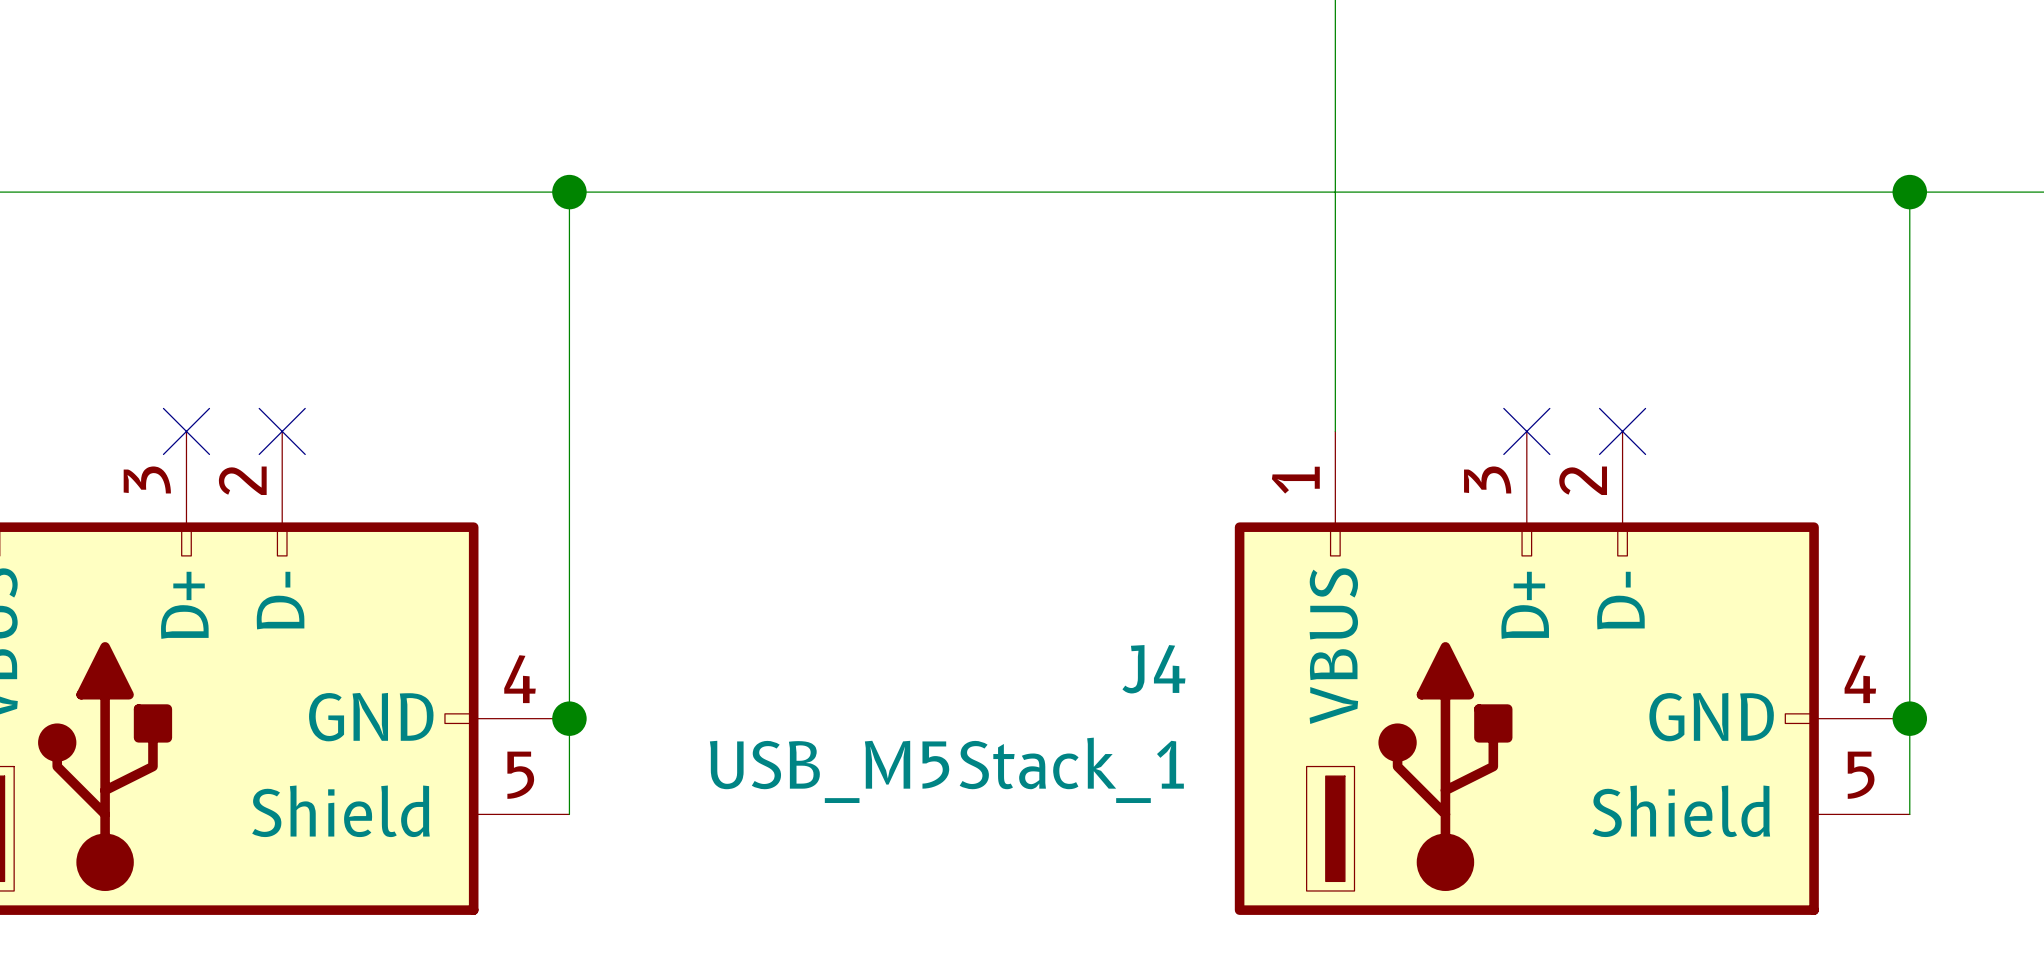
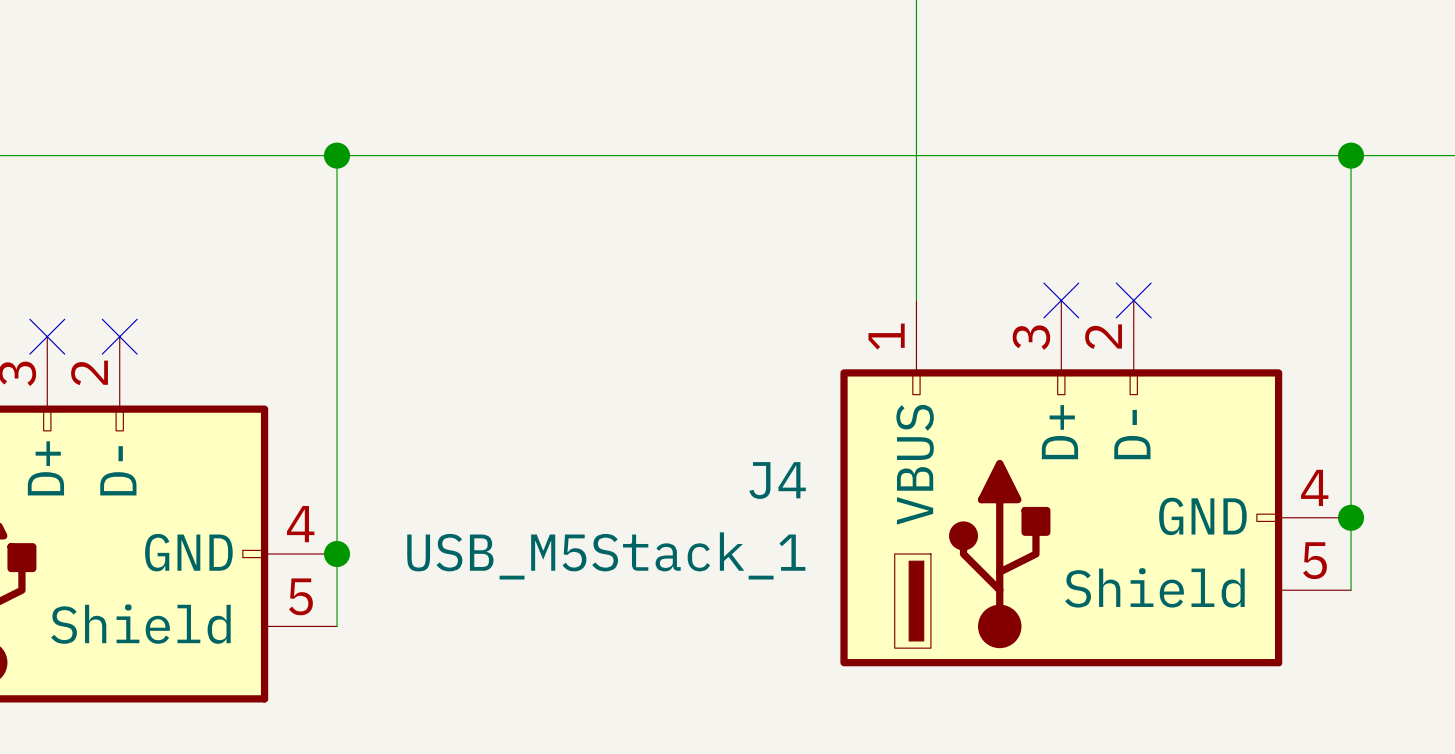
no-connect mark position: (1526, 431) -> (1061, 300)
no-connect mark position: (1622, 431) -> (1133, 300)
J4 position: (1572, 673) -> (1095, 483)
junction position: (1909, 718) -> (1351, 517)
wire: (1909, 766) (1909, 814) -> none

